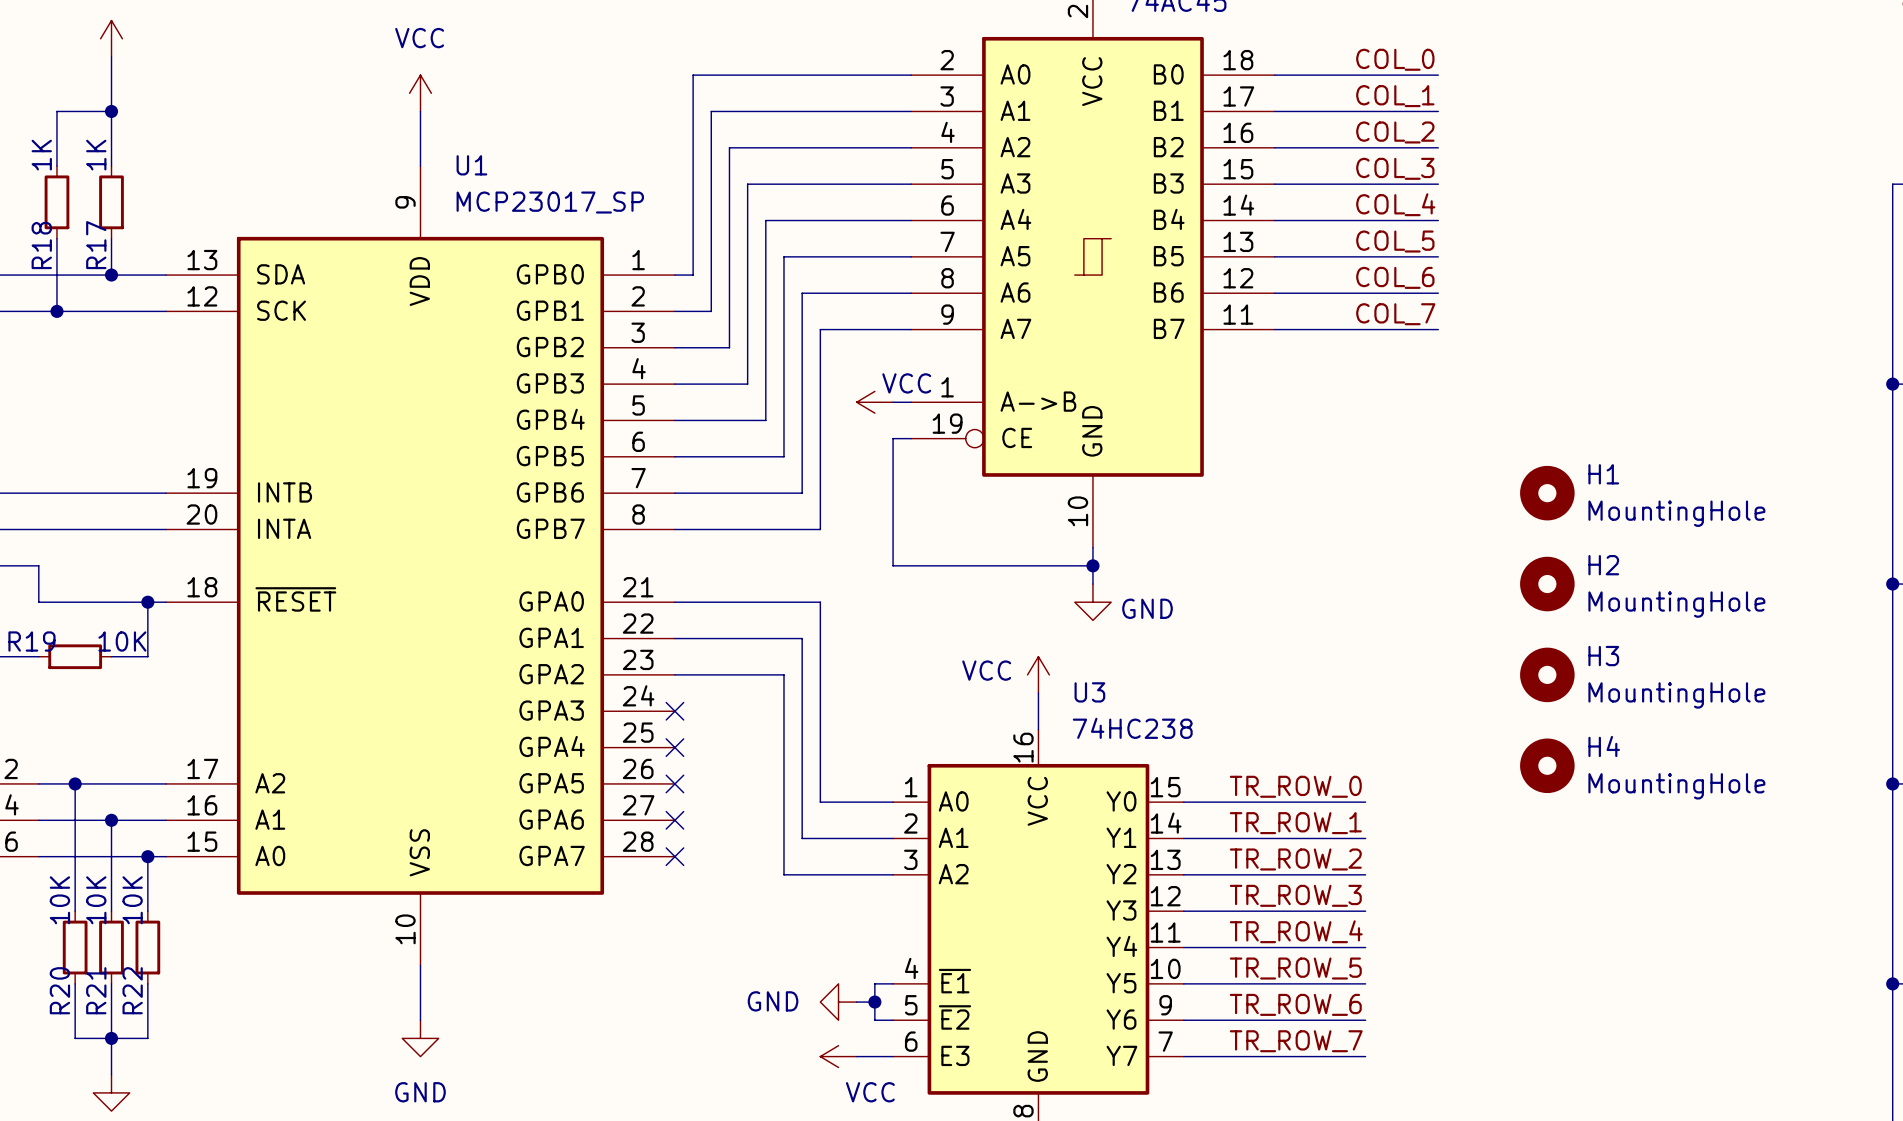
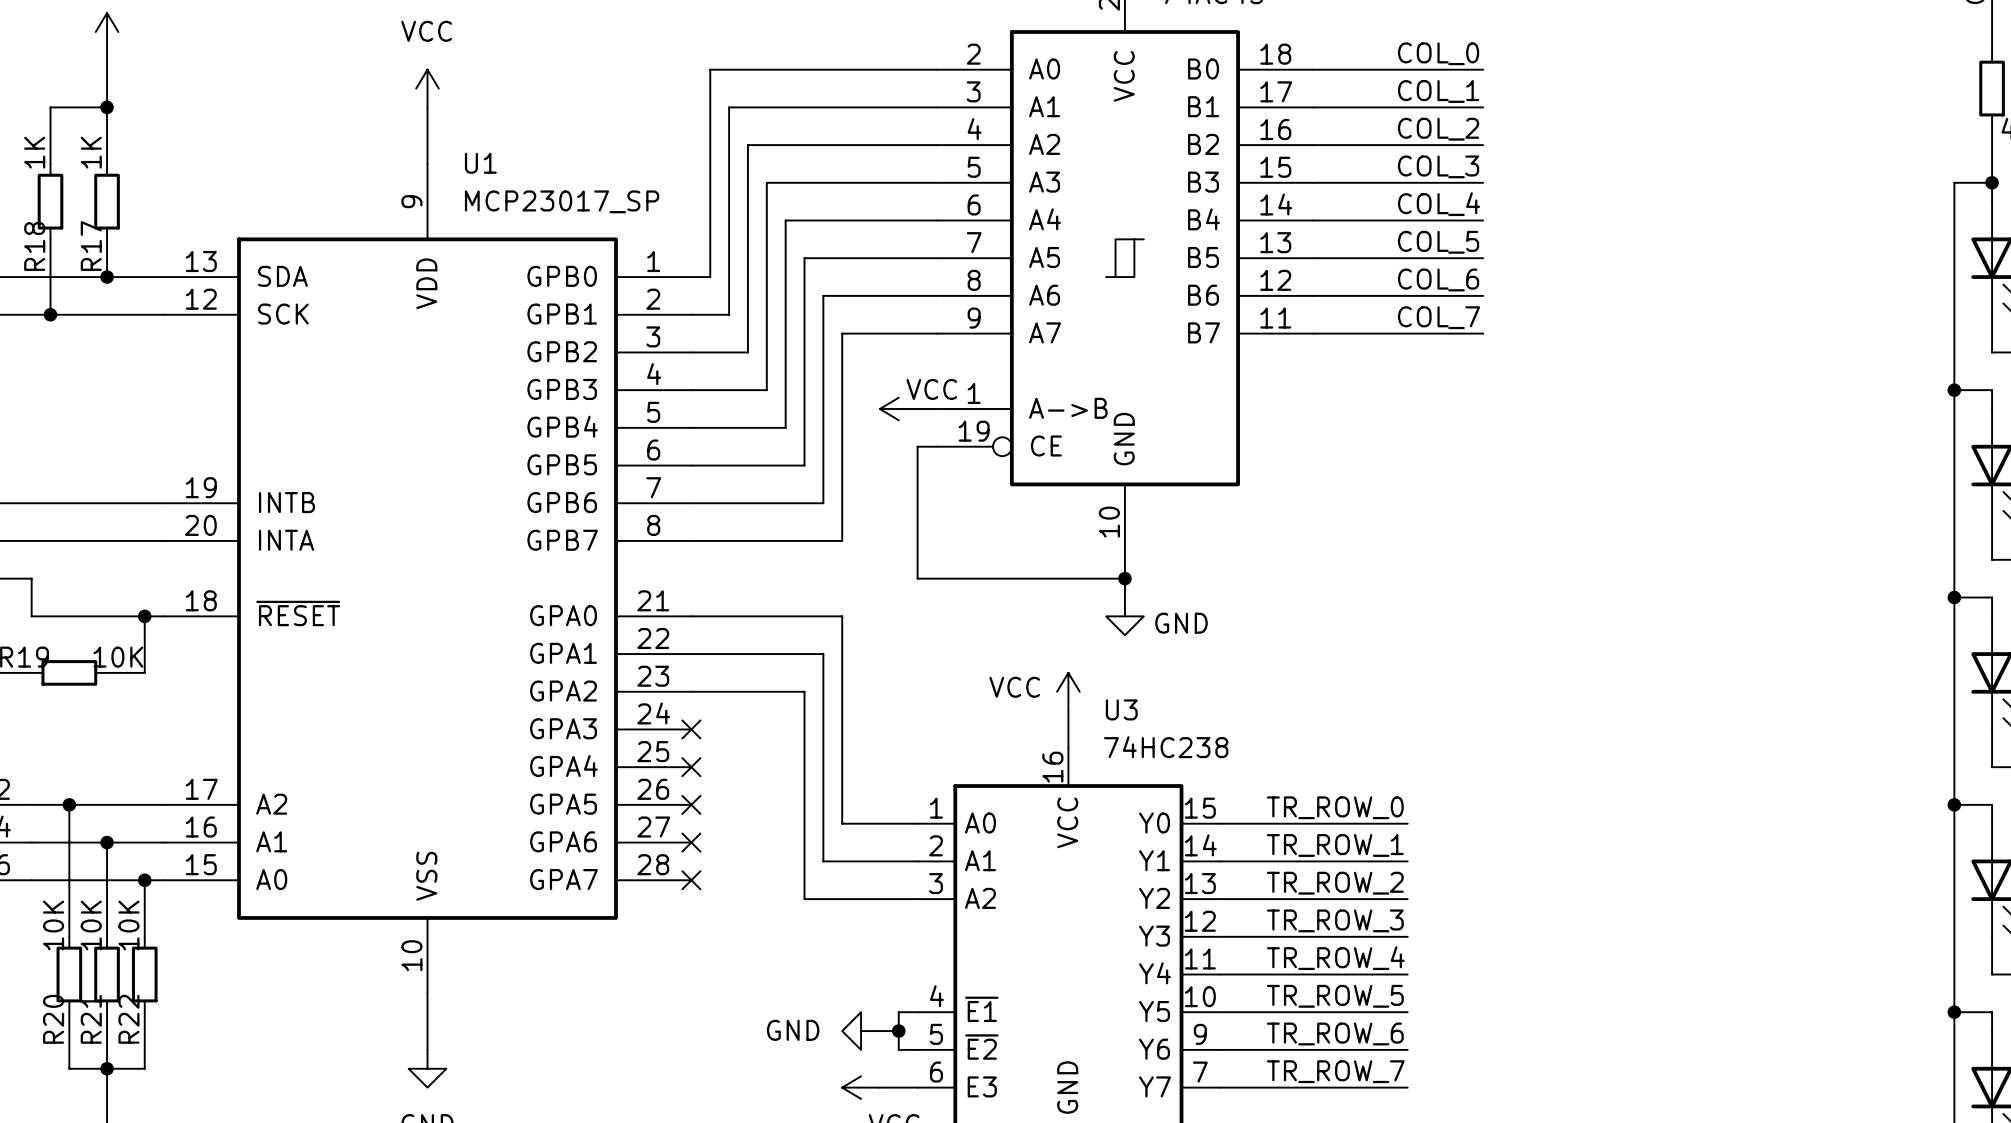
H1: MountingHole (1547, 493) -> none
H2: MountingHole (1547, 584) -> none
H3: MountingHole (1547, 674) -> none
H4: MountingHole (1547, 765) -> none

